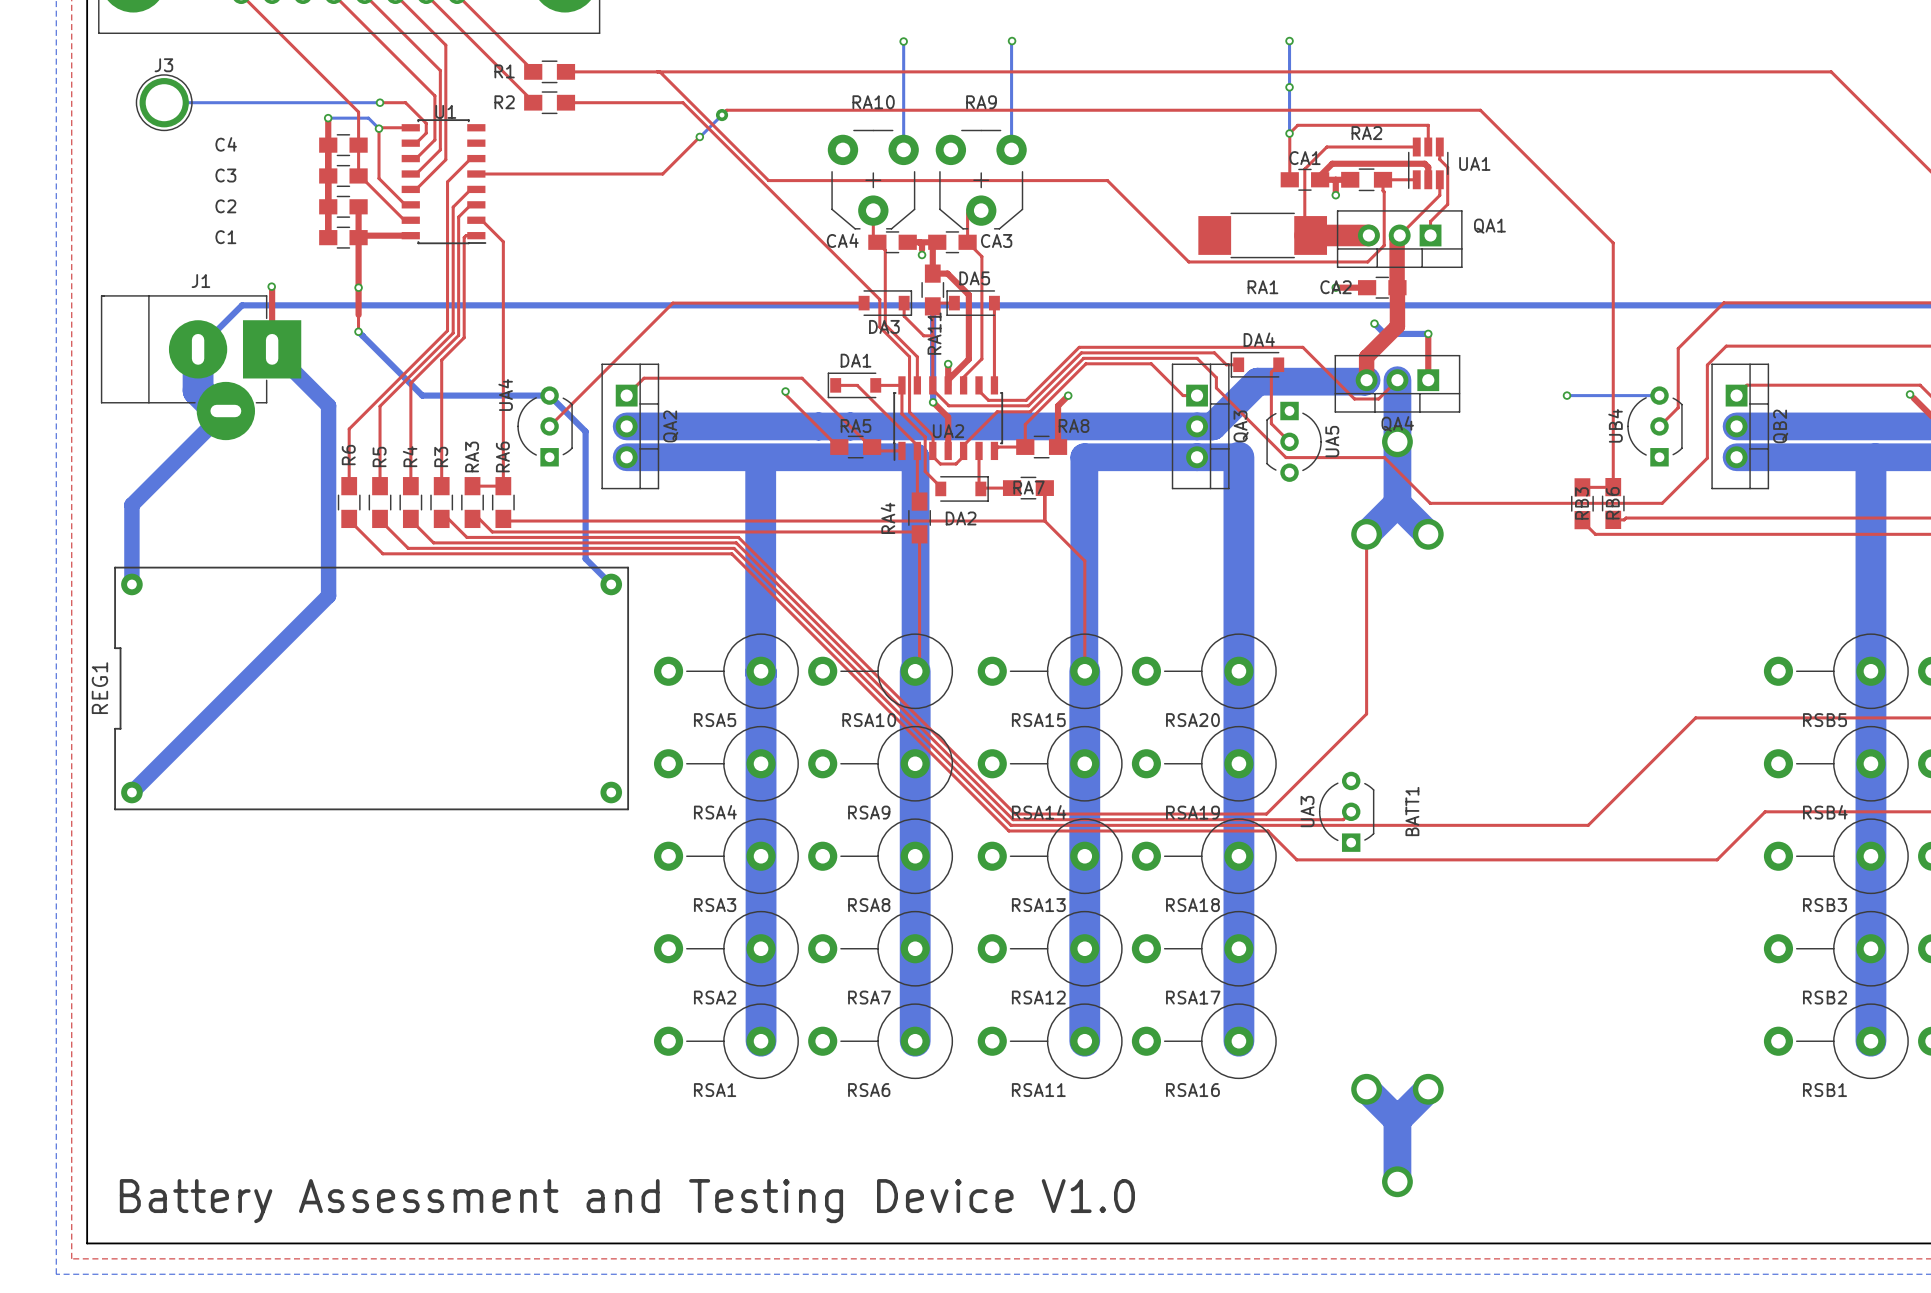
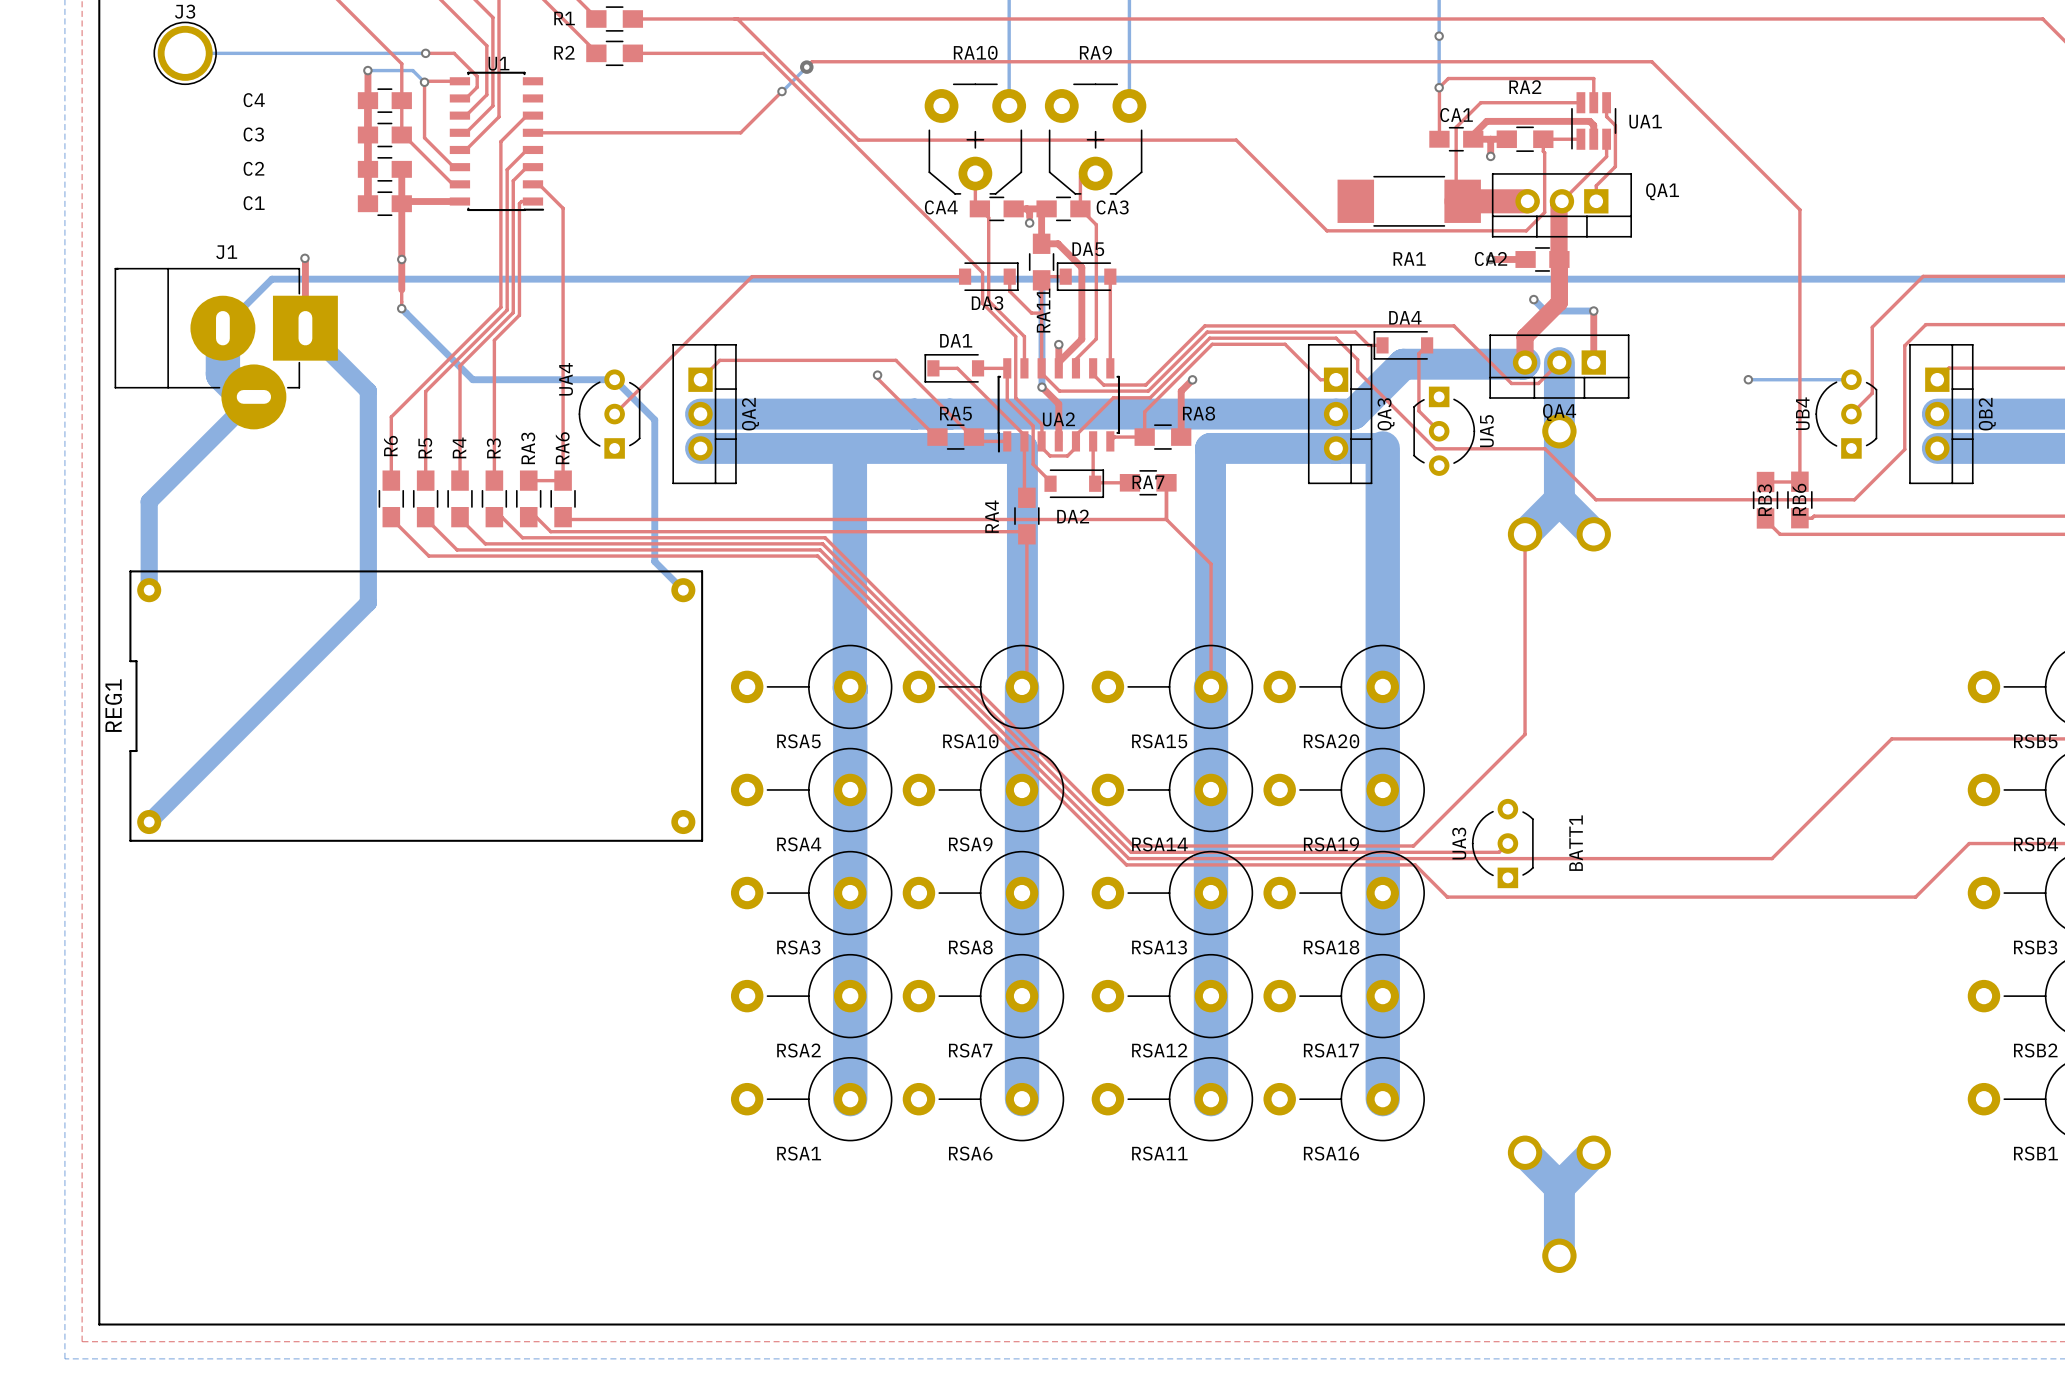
text: Battery Assessment and Testing Device V1.0 (627, 1201) -> none

